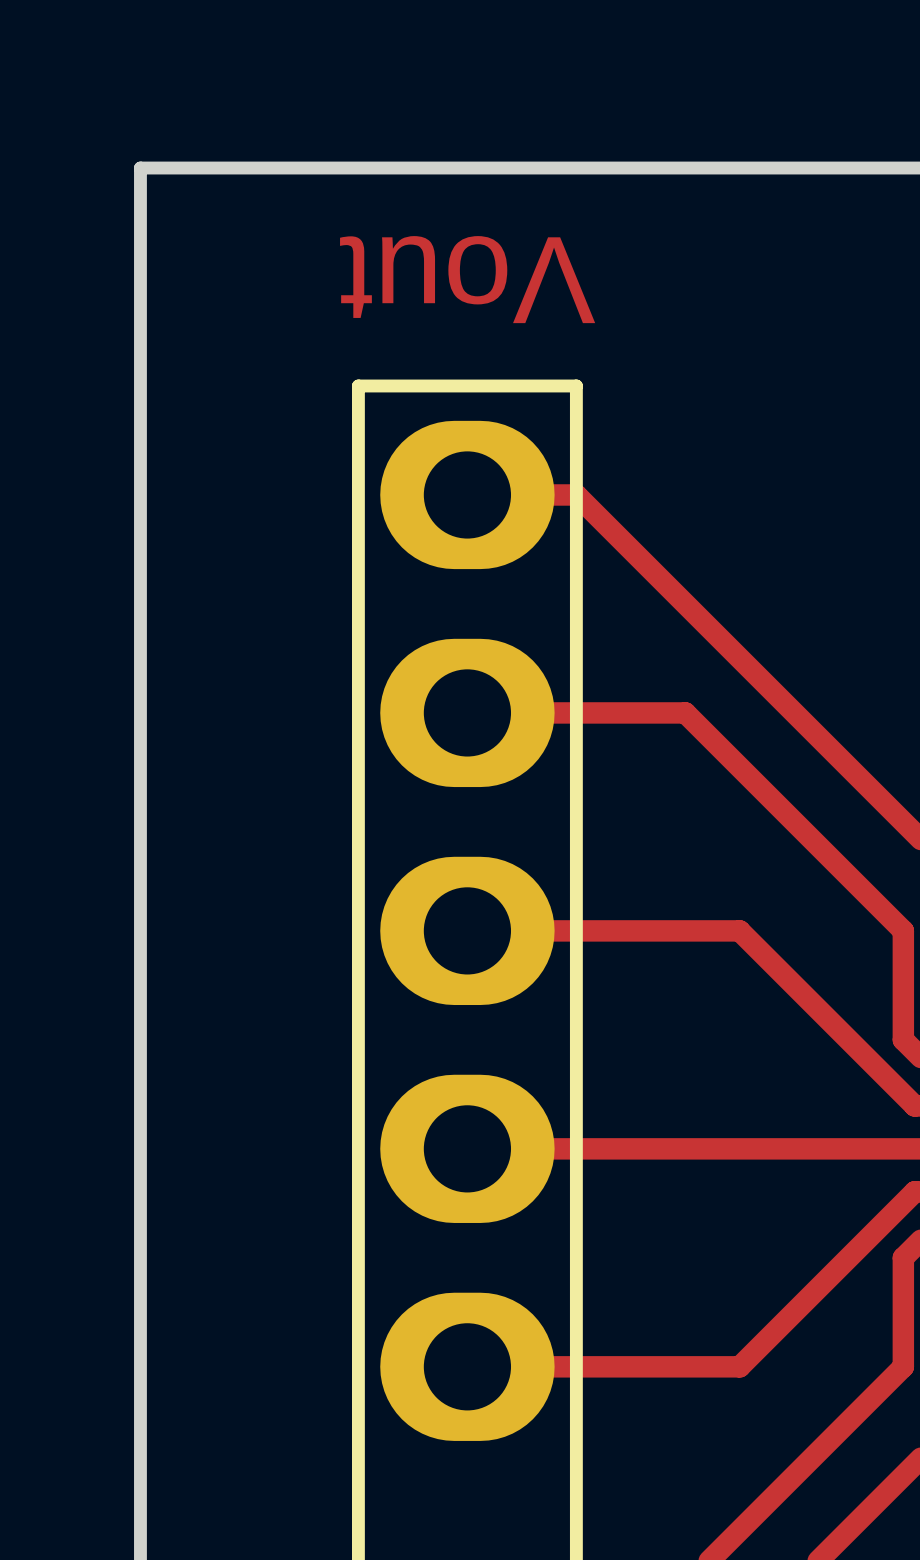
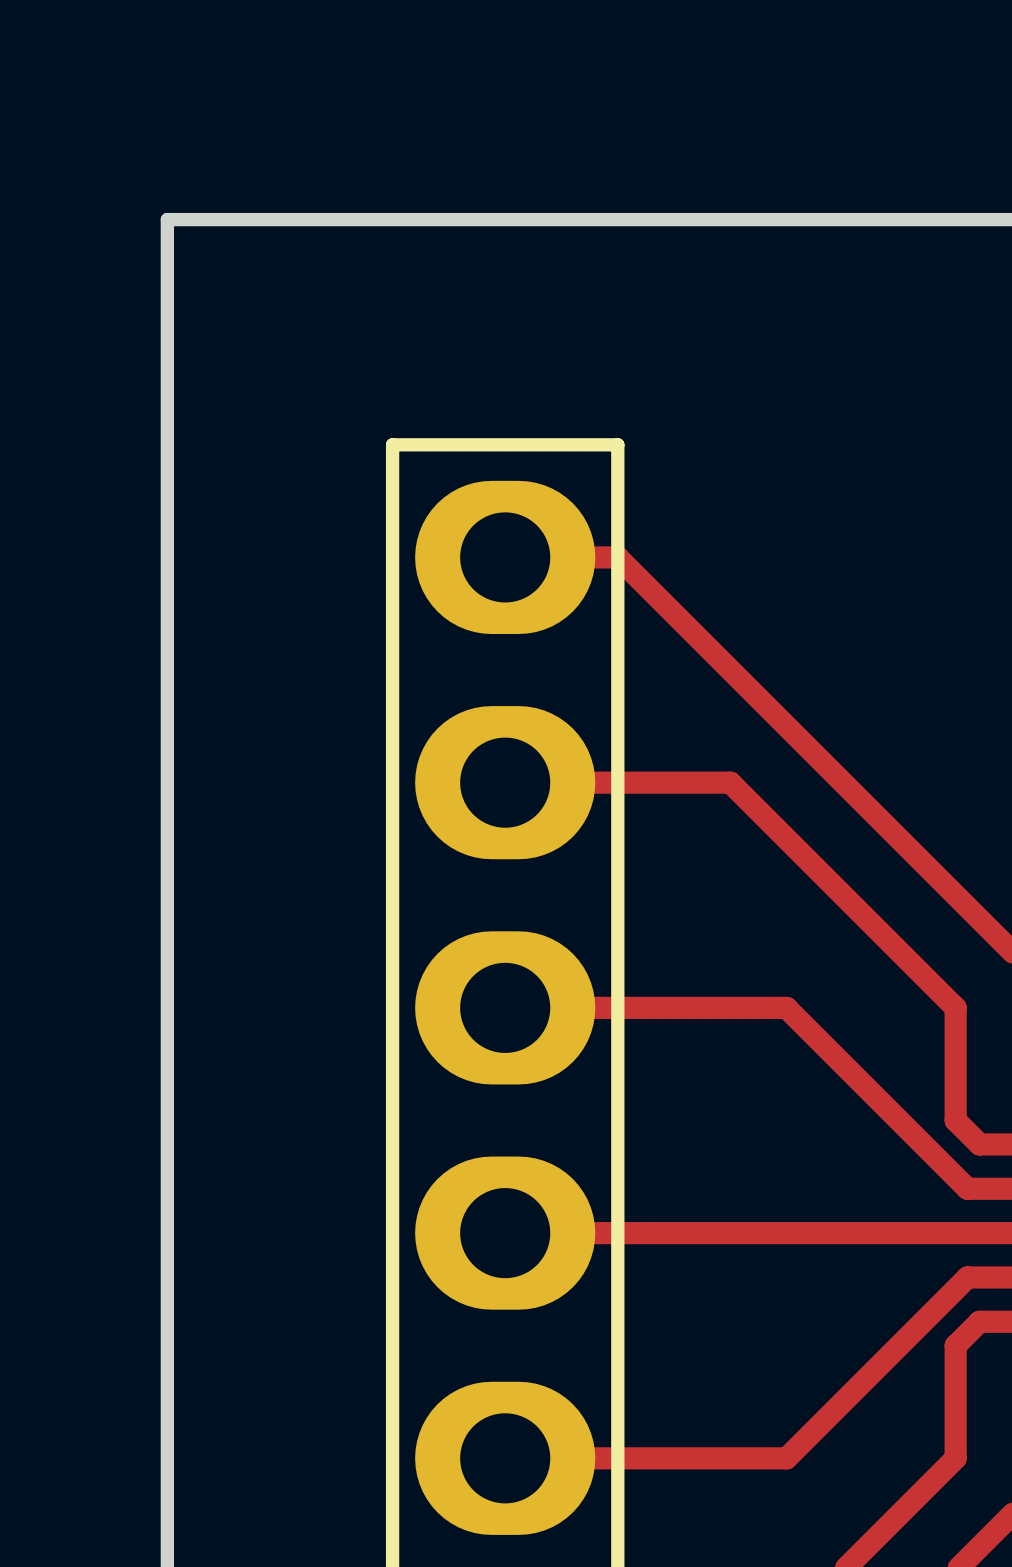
text: Vout (467, 279) -> none

